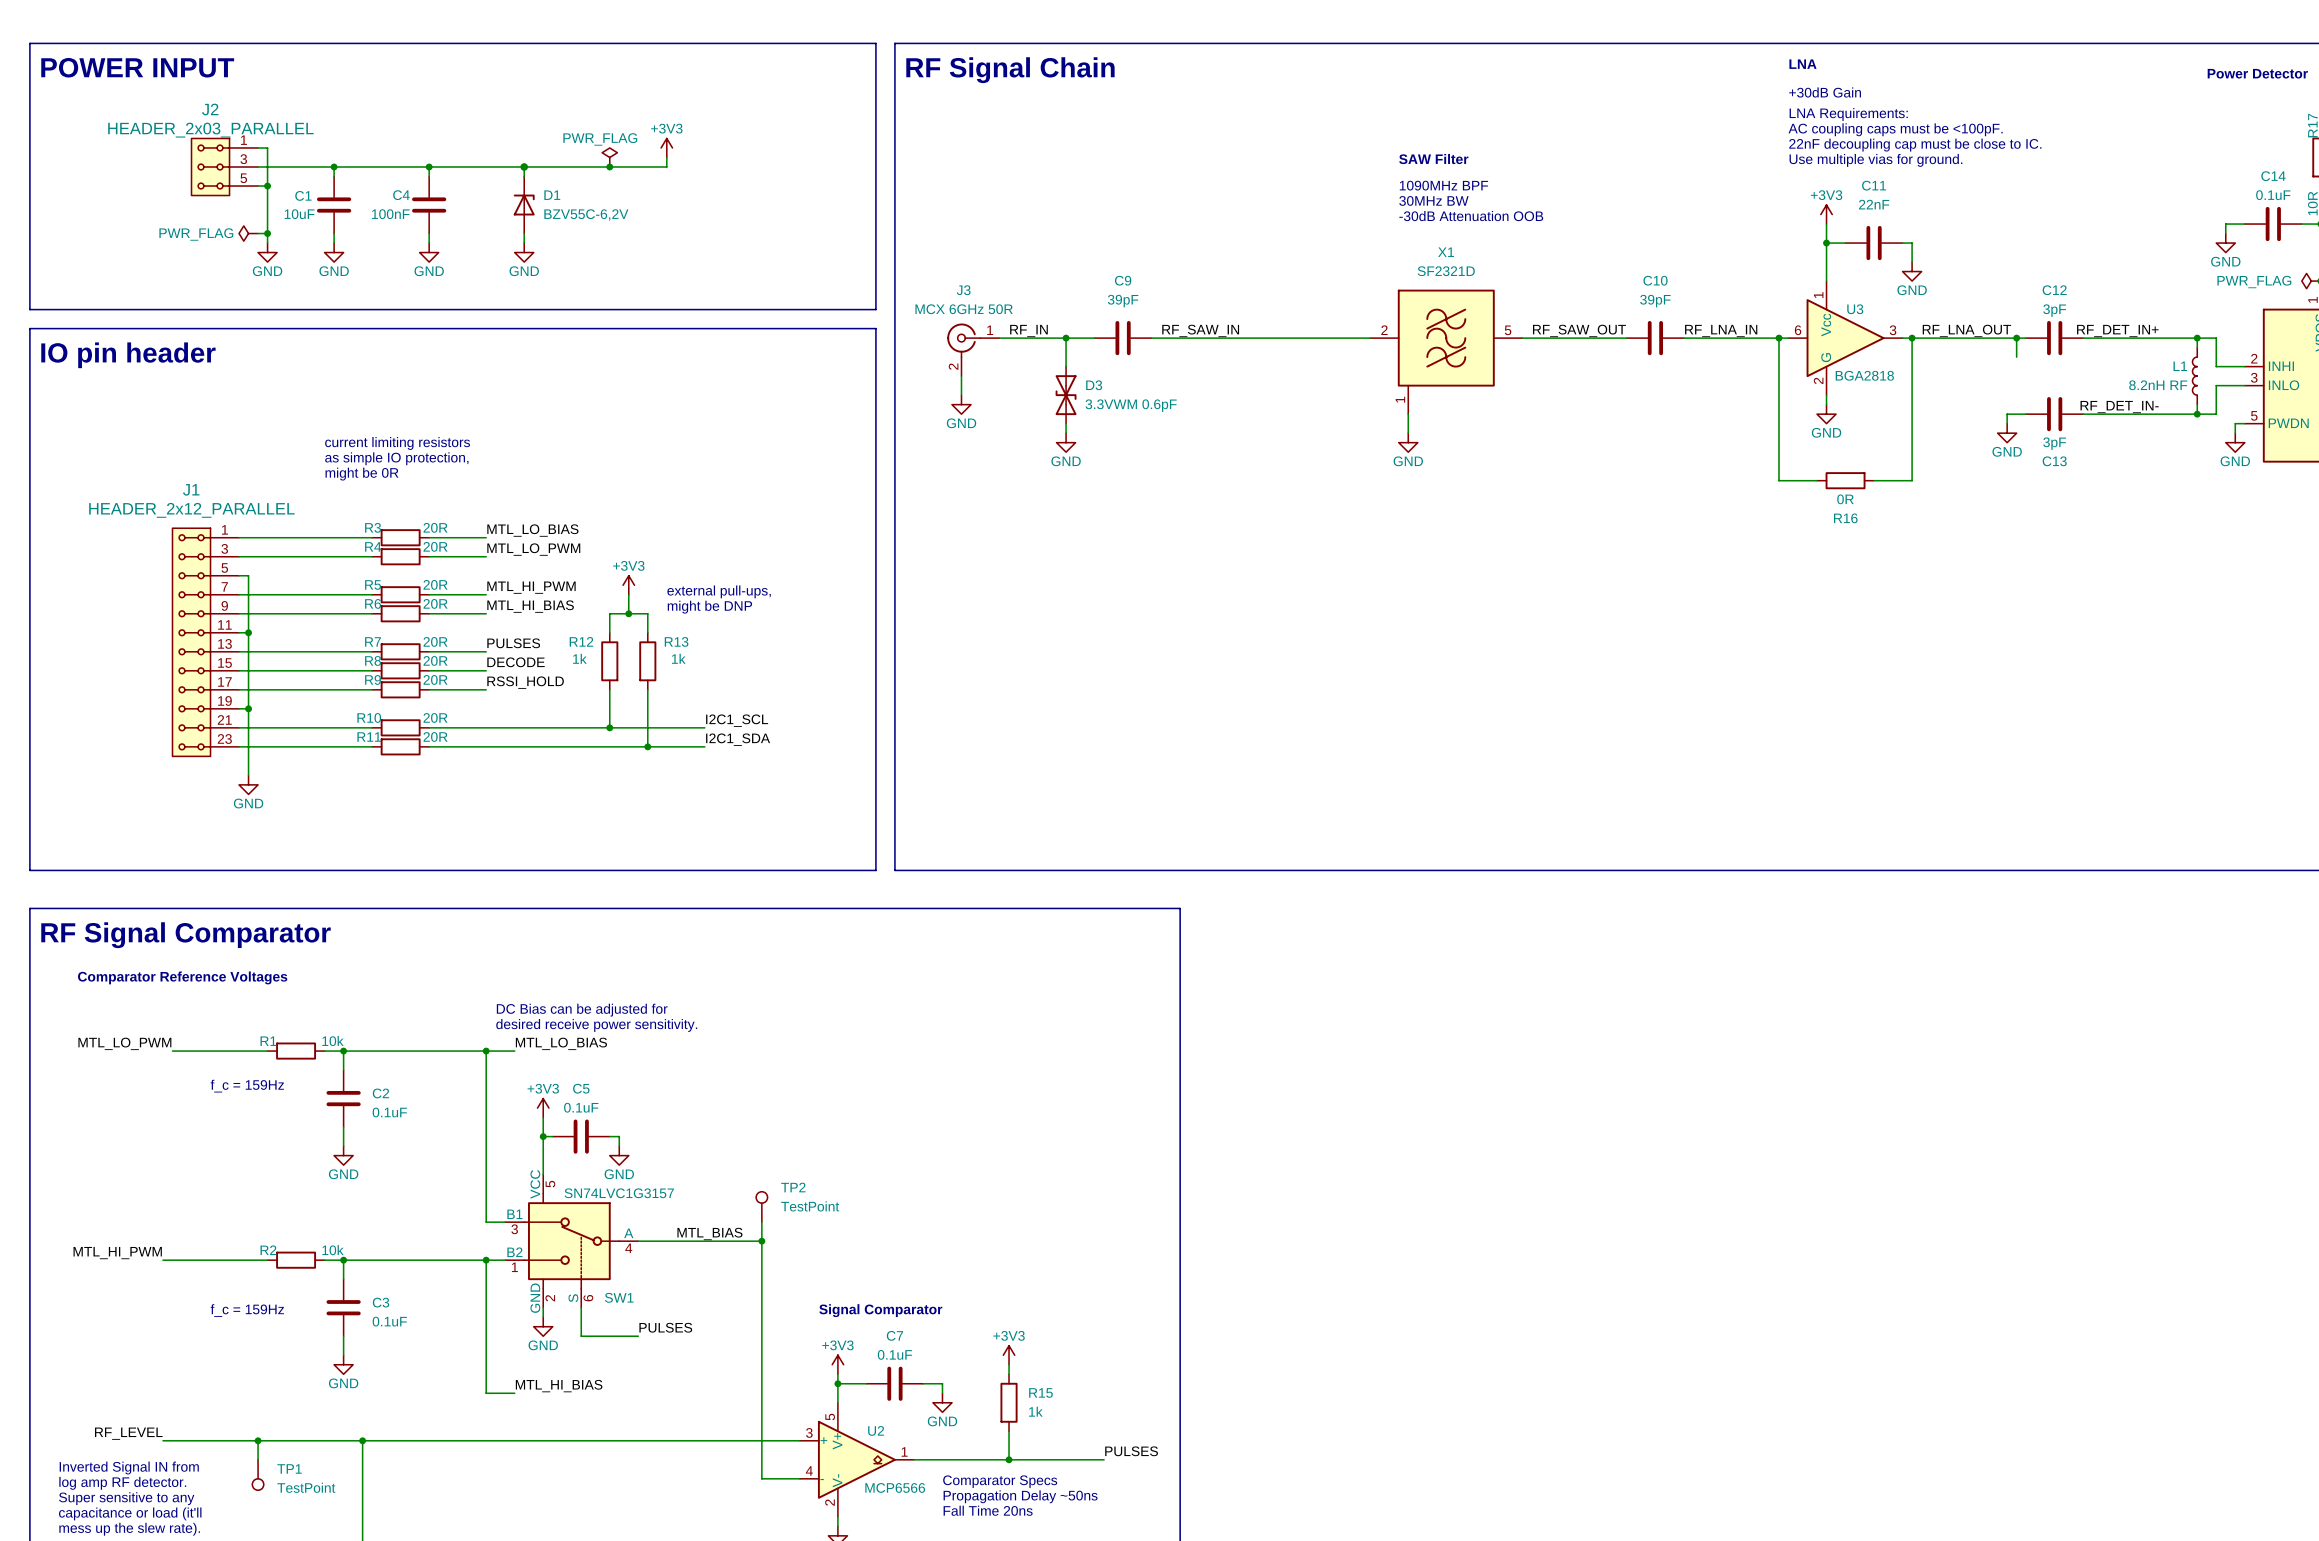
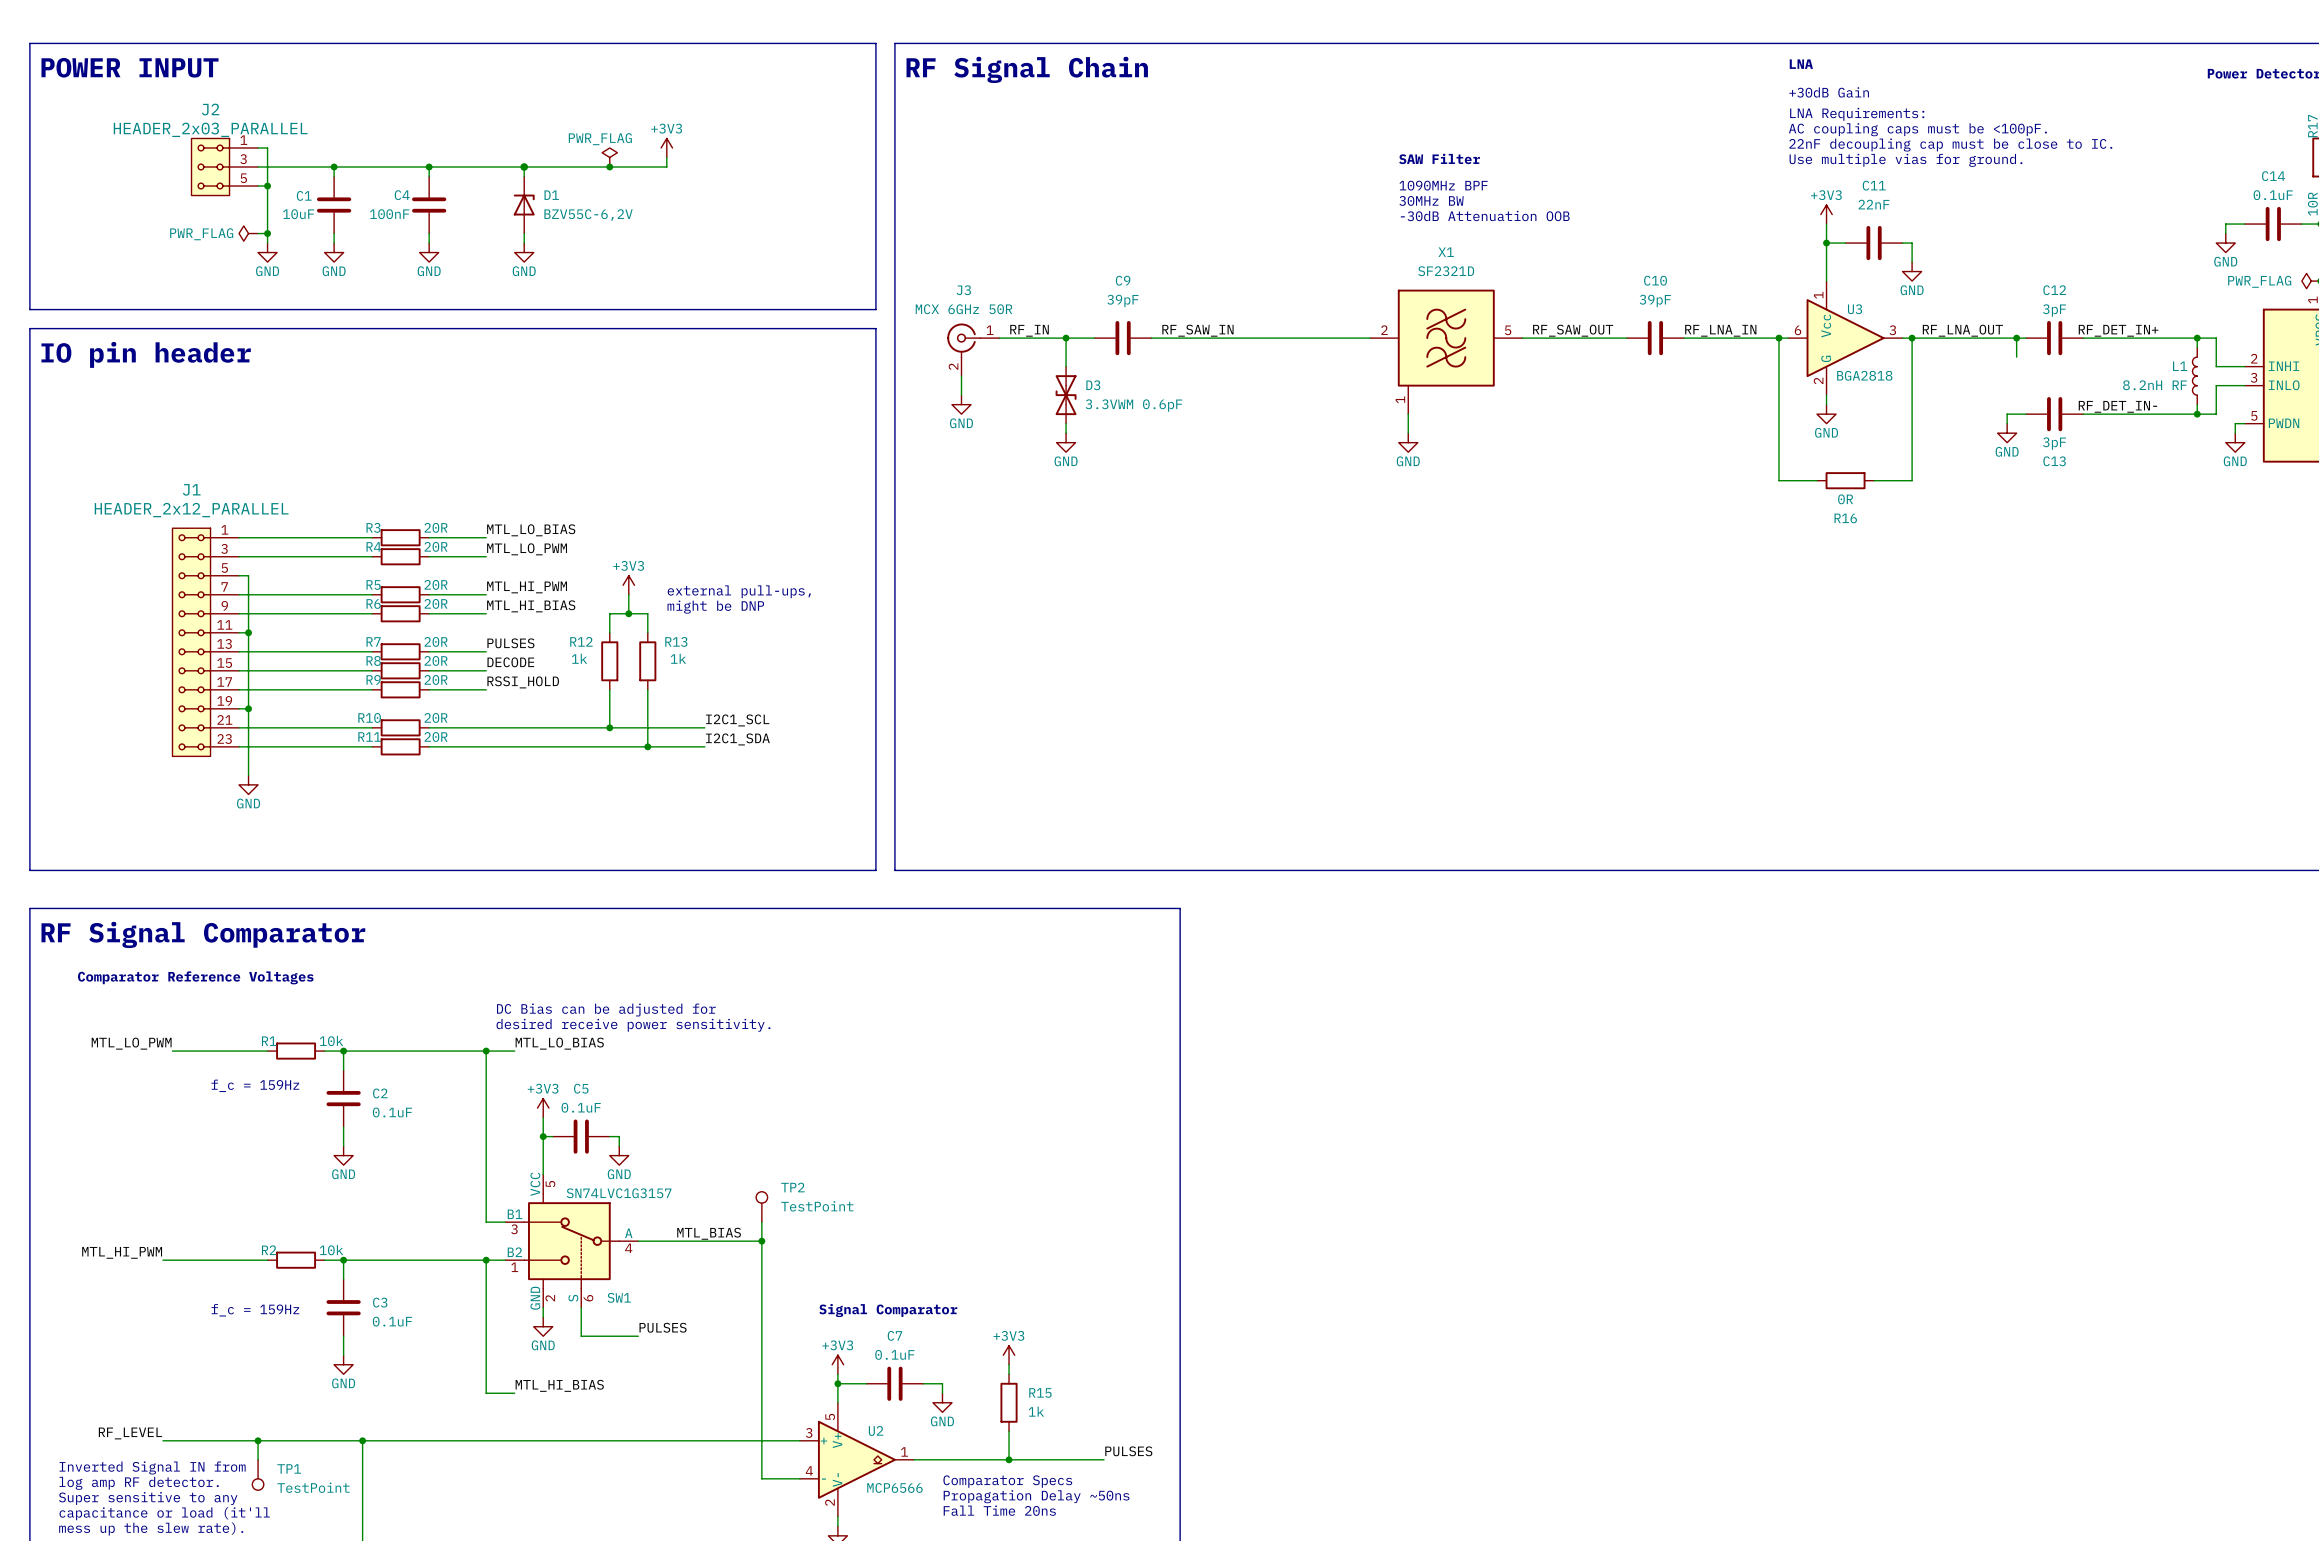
text: current limiting resistors (397, 443) -> none
text: as simple IO protection, (396, 458) -> none
text: might be 0R (361, 474) -> none

